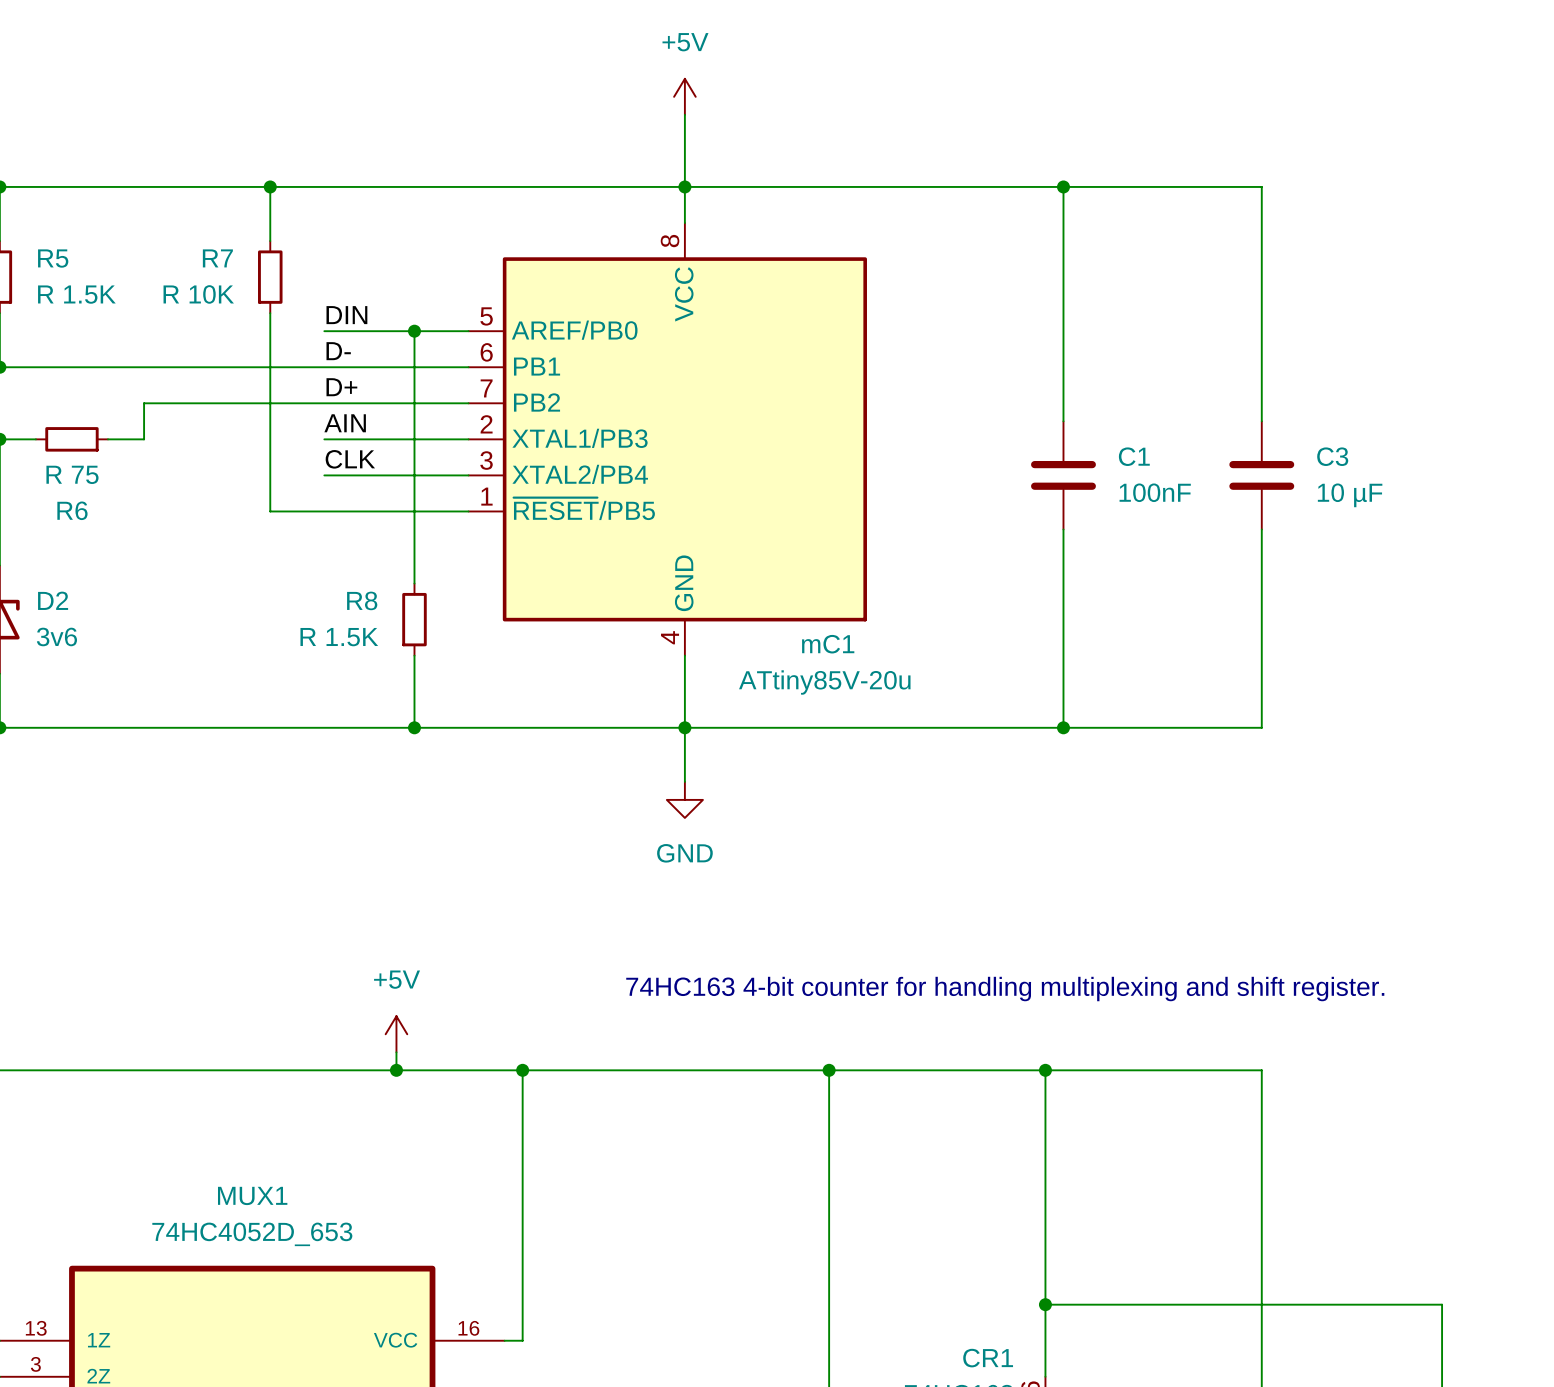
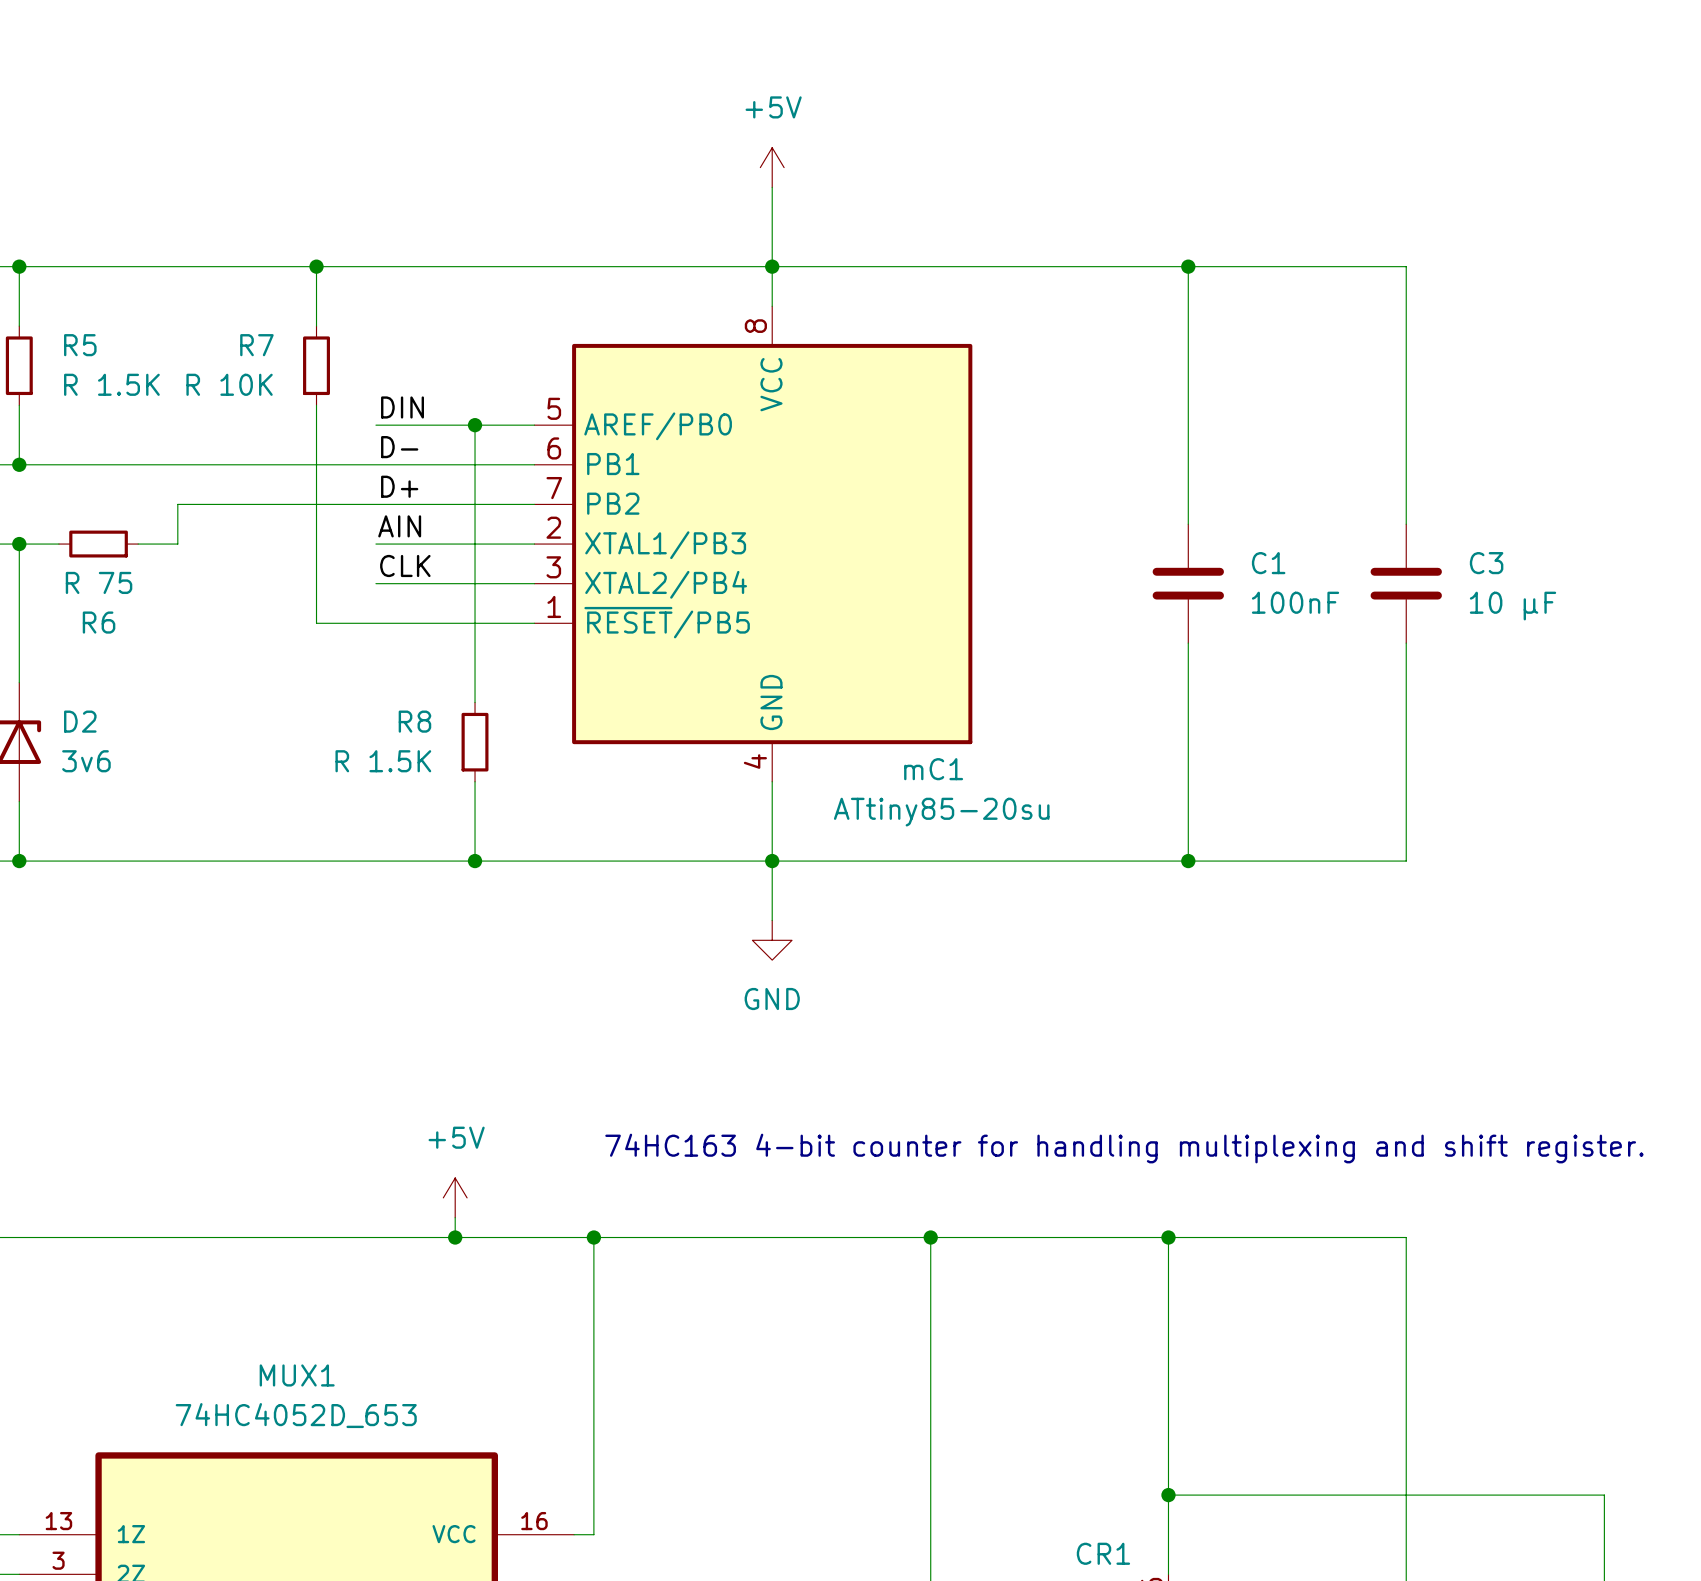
mC1 value: ATtiny85V-20u (824, 682) -> ATtiny85-20su (941, 812)

